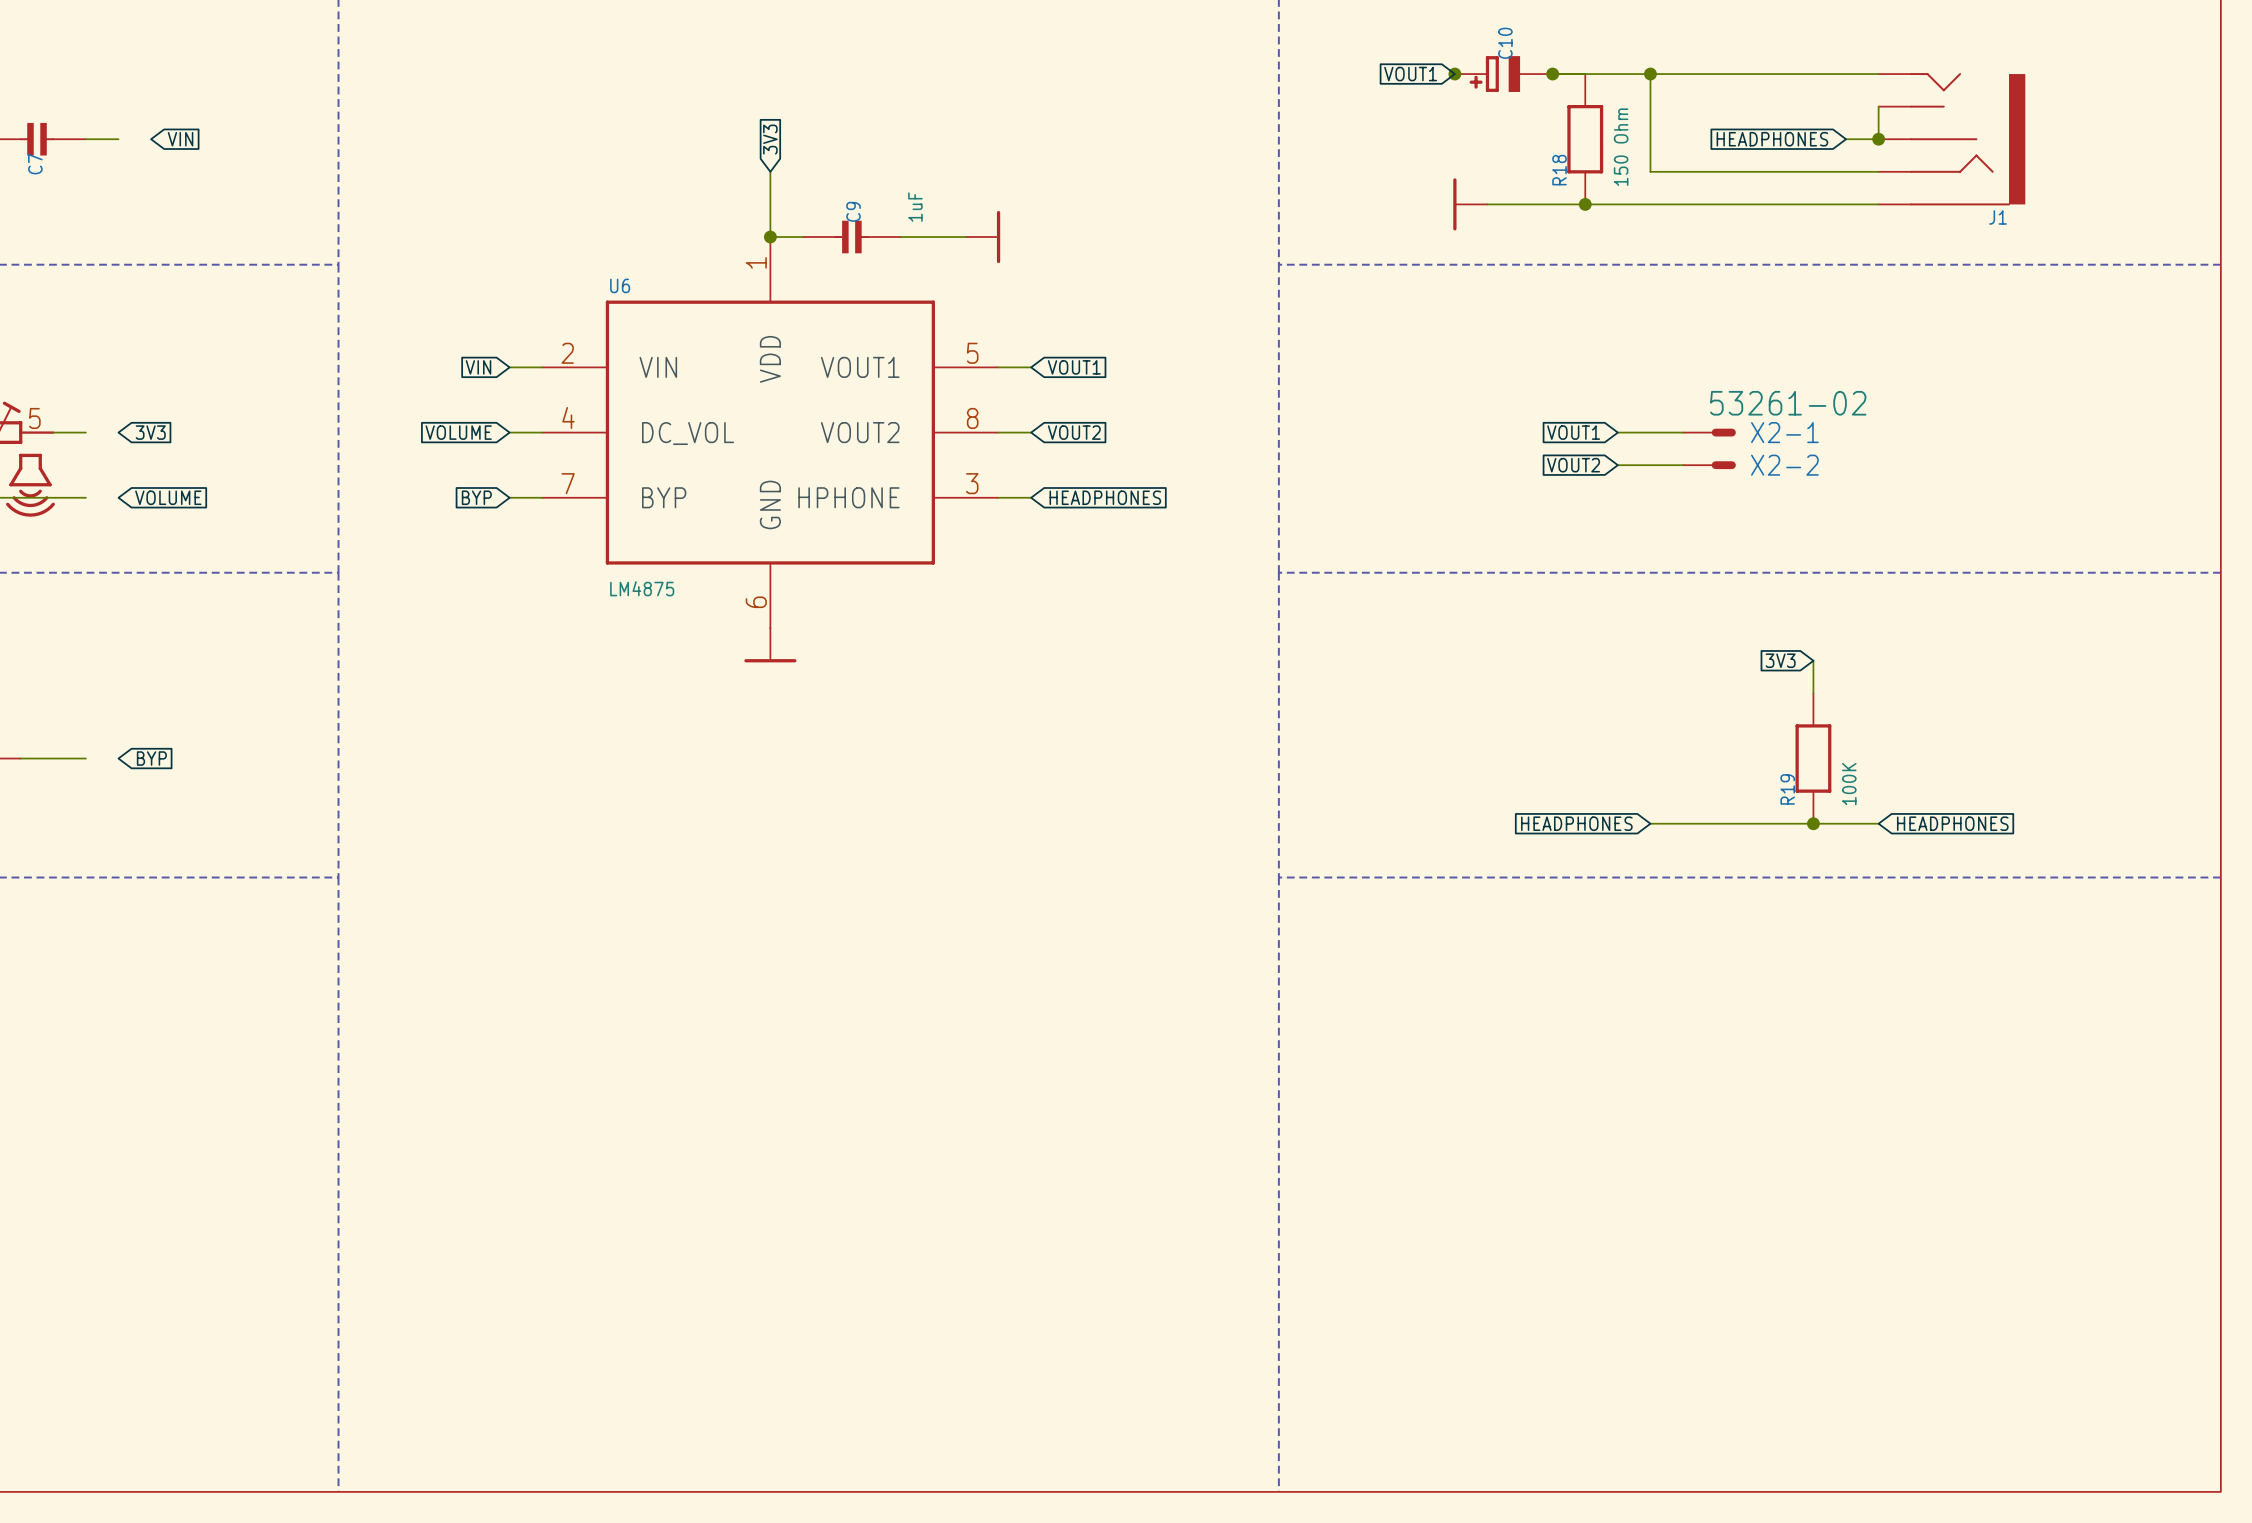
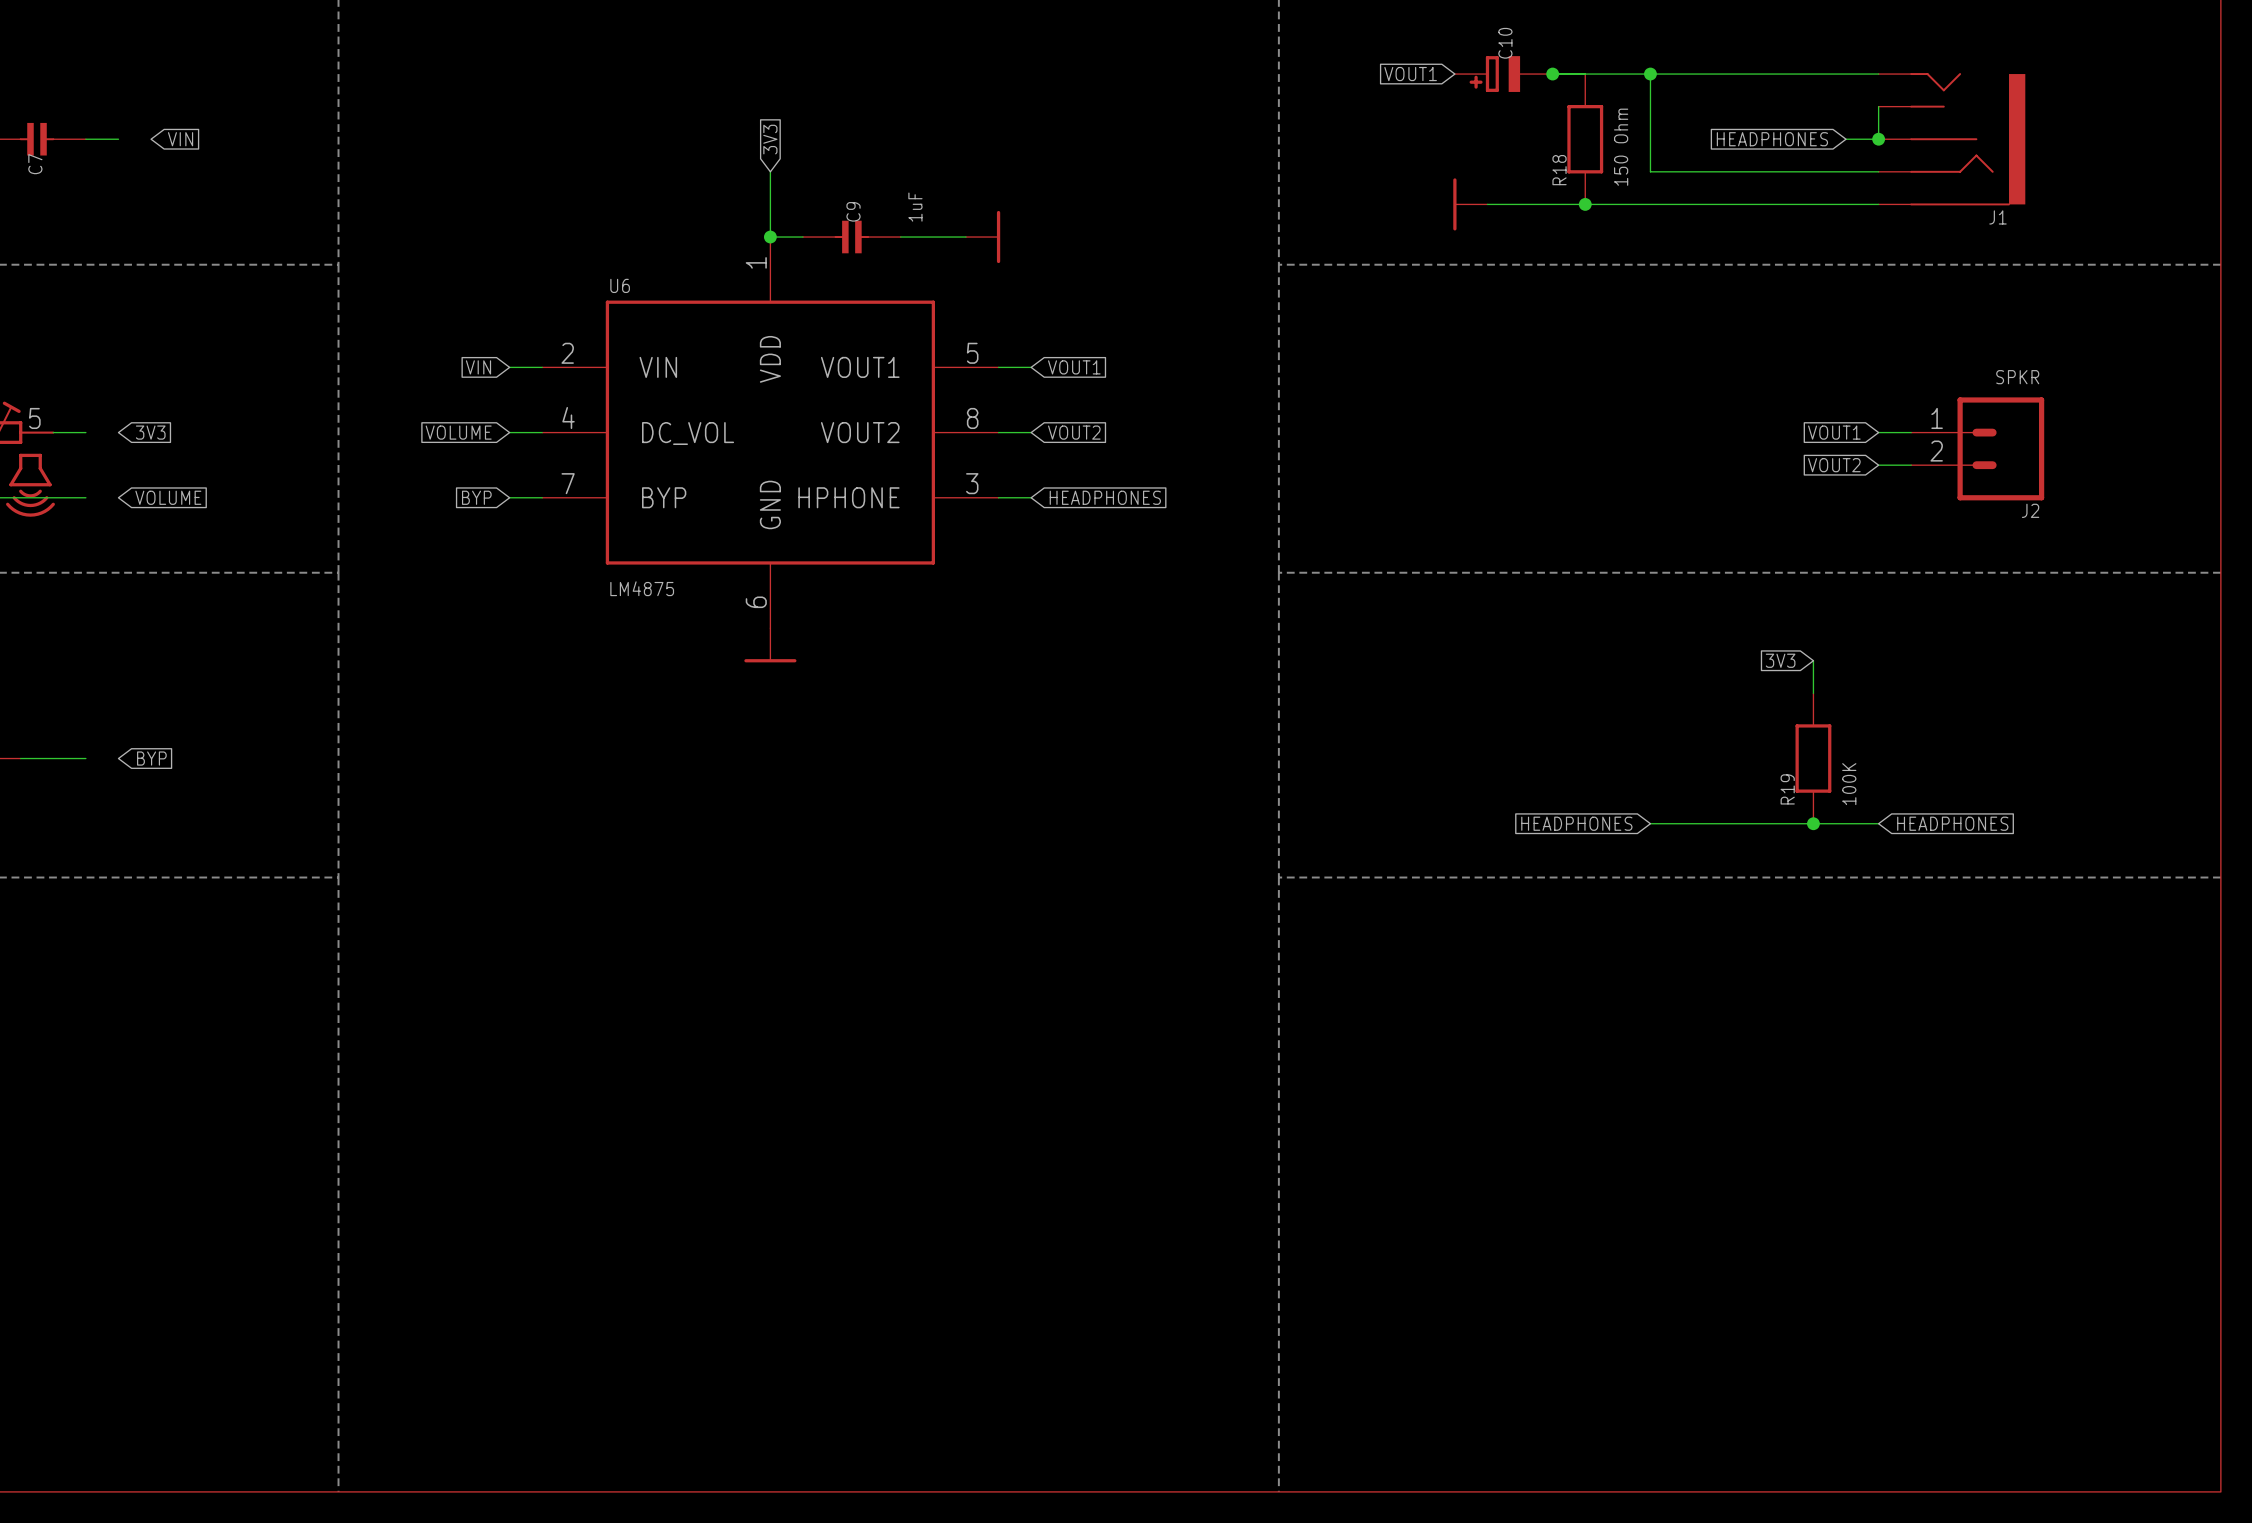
junction: (1454, 74) -> none
global label position: VOUT1 (1573, 432) -> VOUT1 (1834, 432)
wire: (1617, 432) (1683, 432) -> none
X2-1: 53261-02 (1709, 432) -> none
wire: none -> (1878, 432) (1911, 432)
J2: none -> SPKR (1977, 448)
global label position: VOUT2 (1573, 465) -> VOUT2 (1834, 465)
wire: (1617, 465) (1683, 465) -> none
X2-2: (1709, 465) -> none
wire: none -> (1878, 465) (1911, 465)

